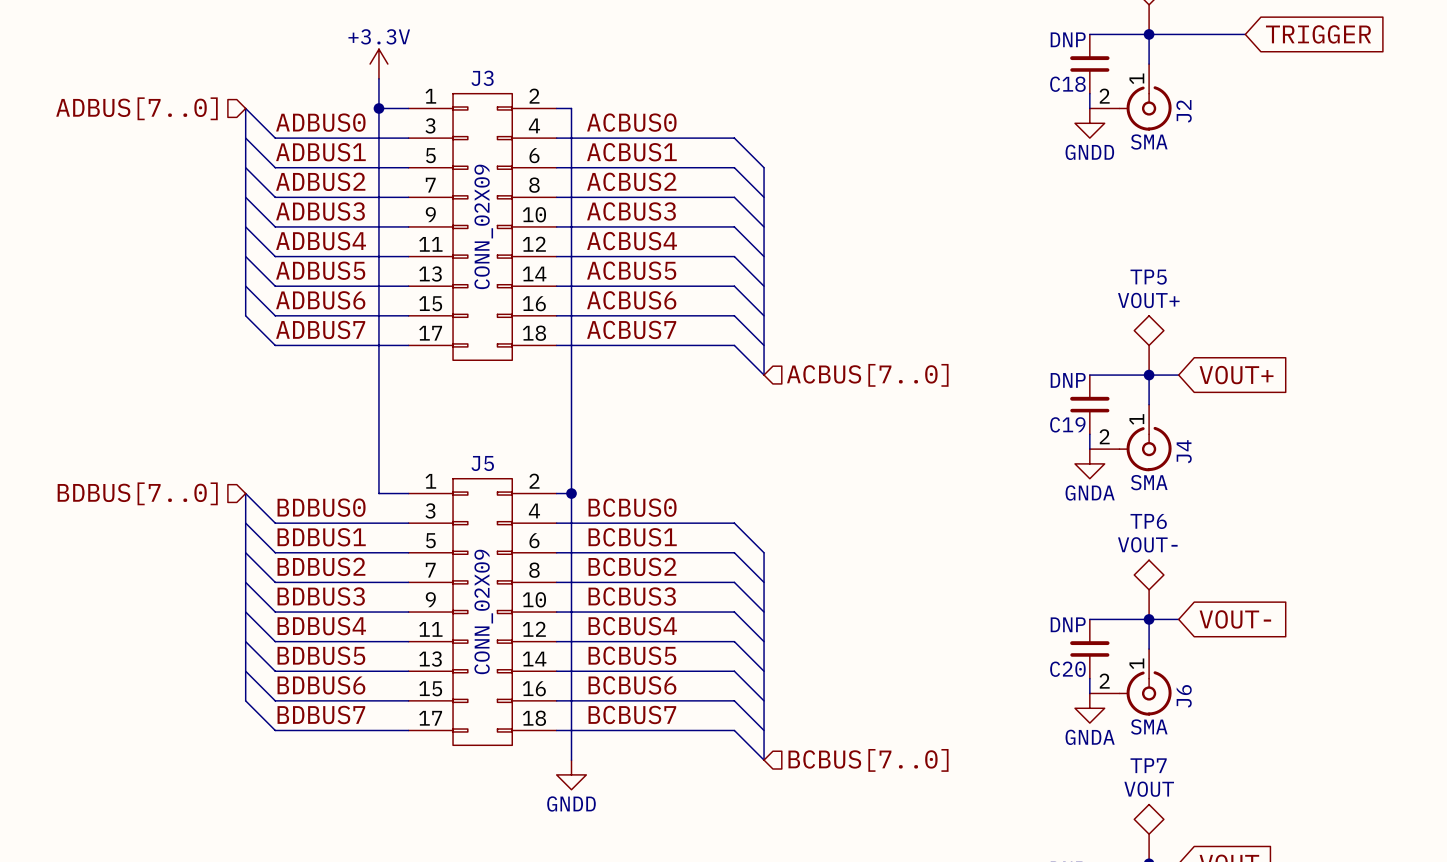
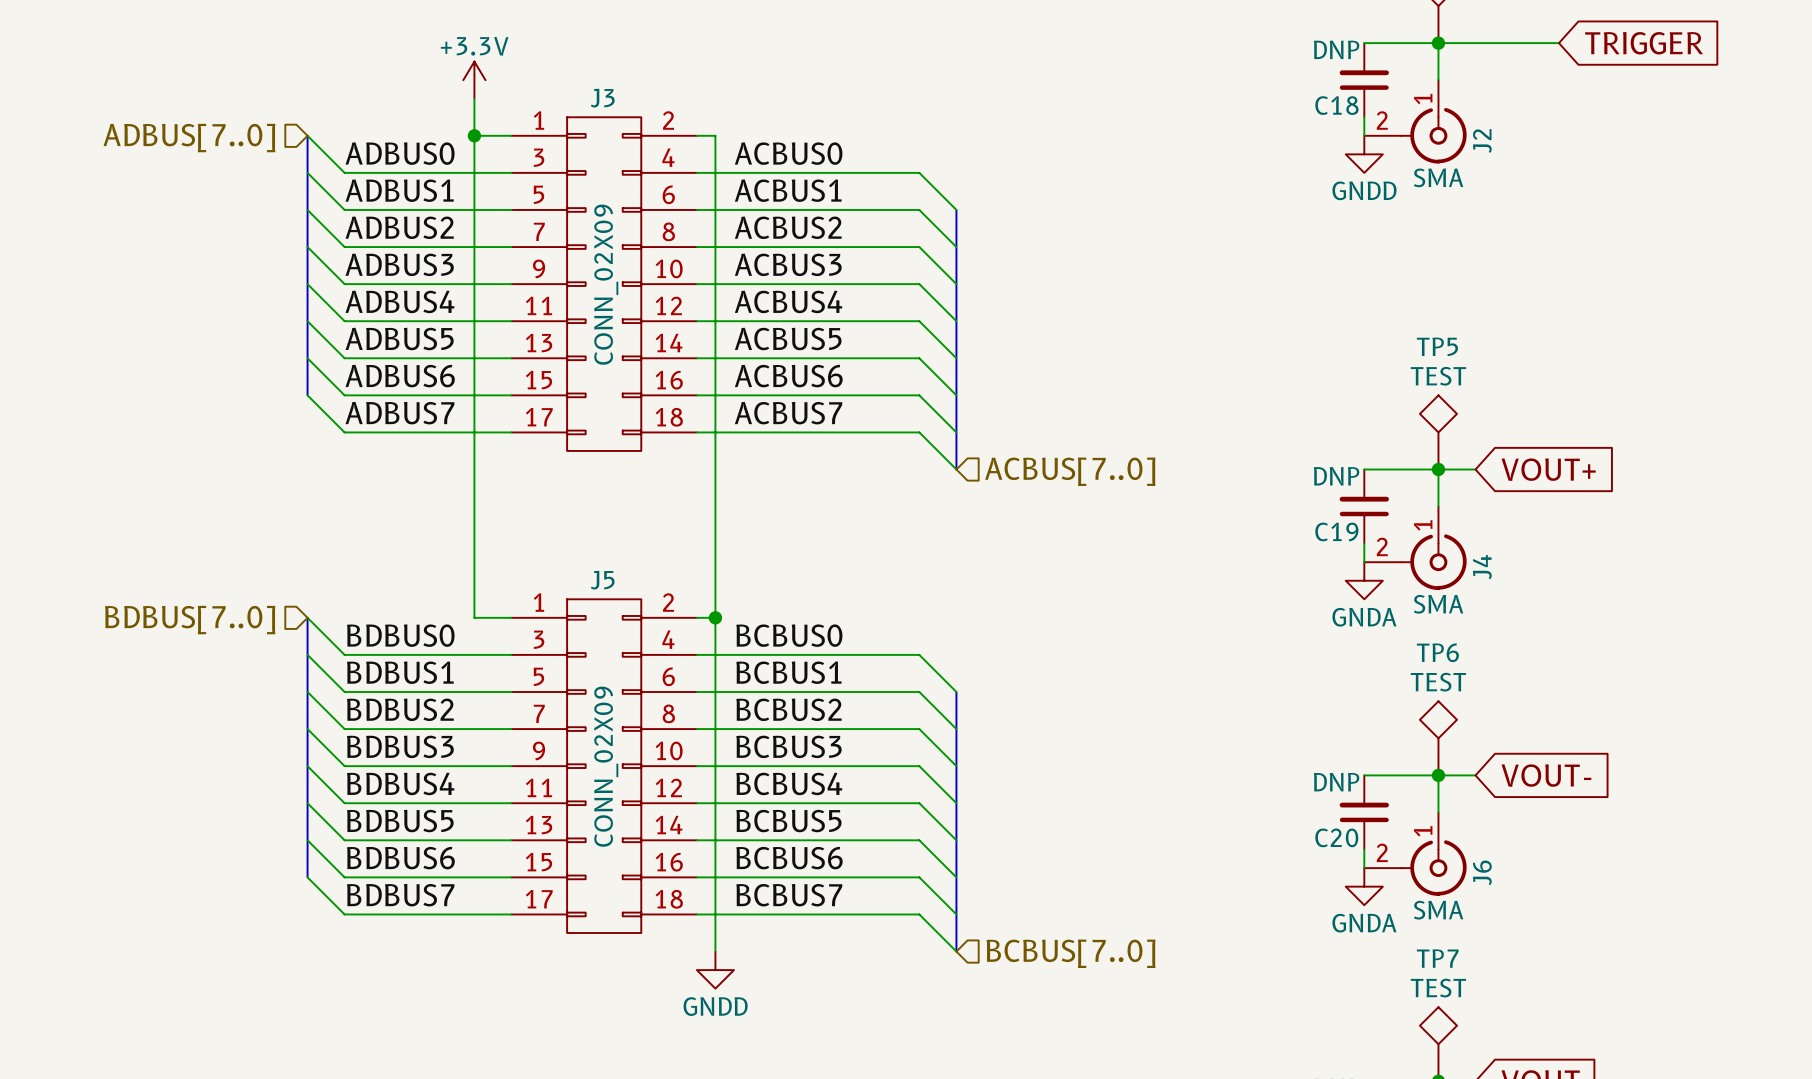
TP5 value: VOUT+ (1148, 300) -> TEST (1438, 376)
TP6 value: VOUT- (1147, 544) -> TEST (1438, 682)
TP7 value: VOUT (1149, 789) -> TEST (1438, 988)

